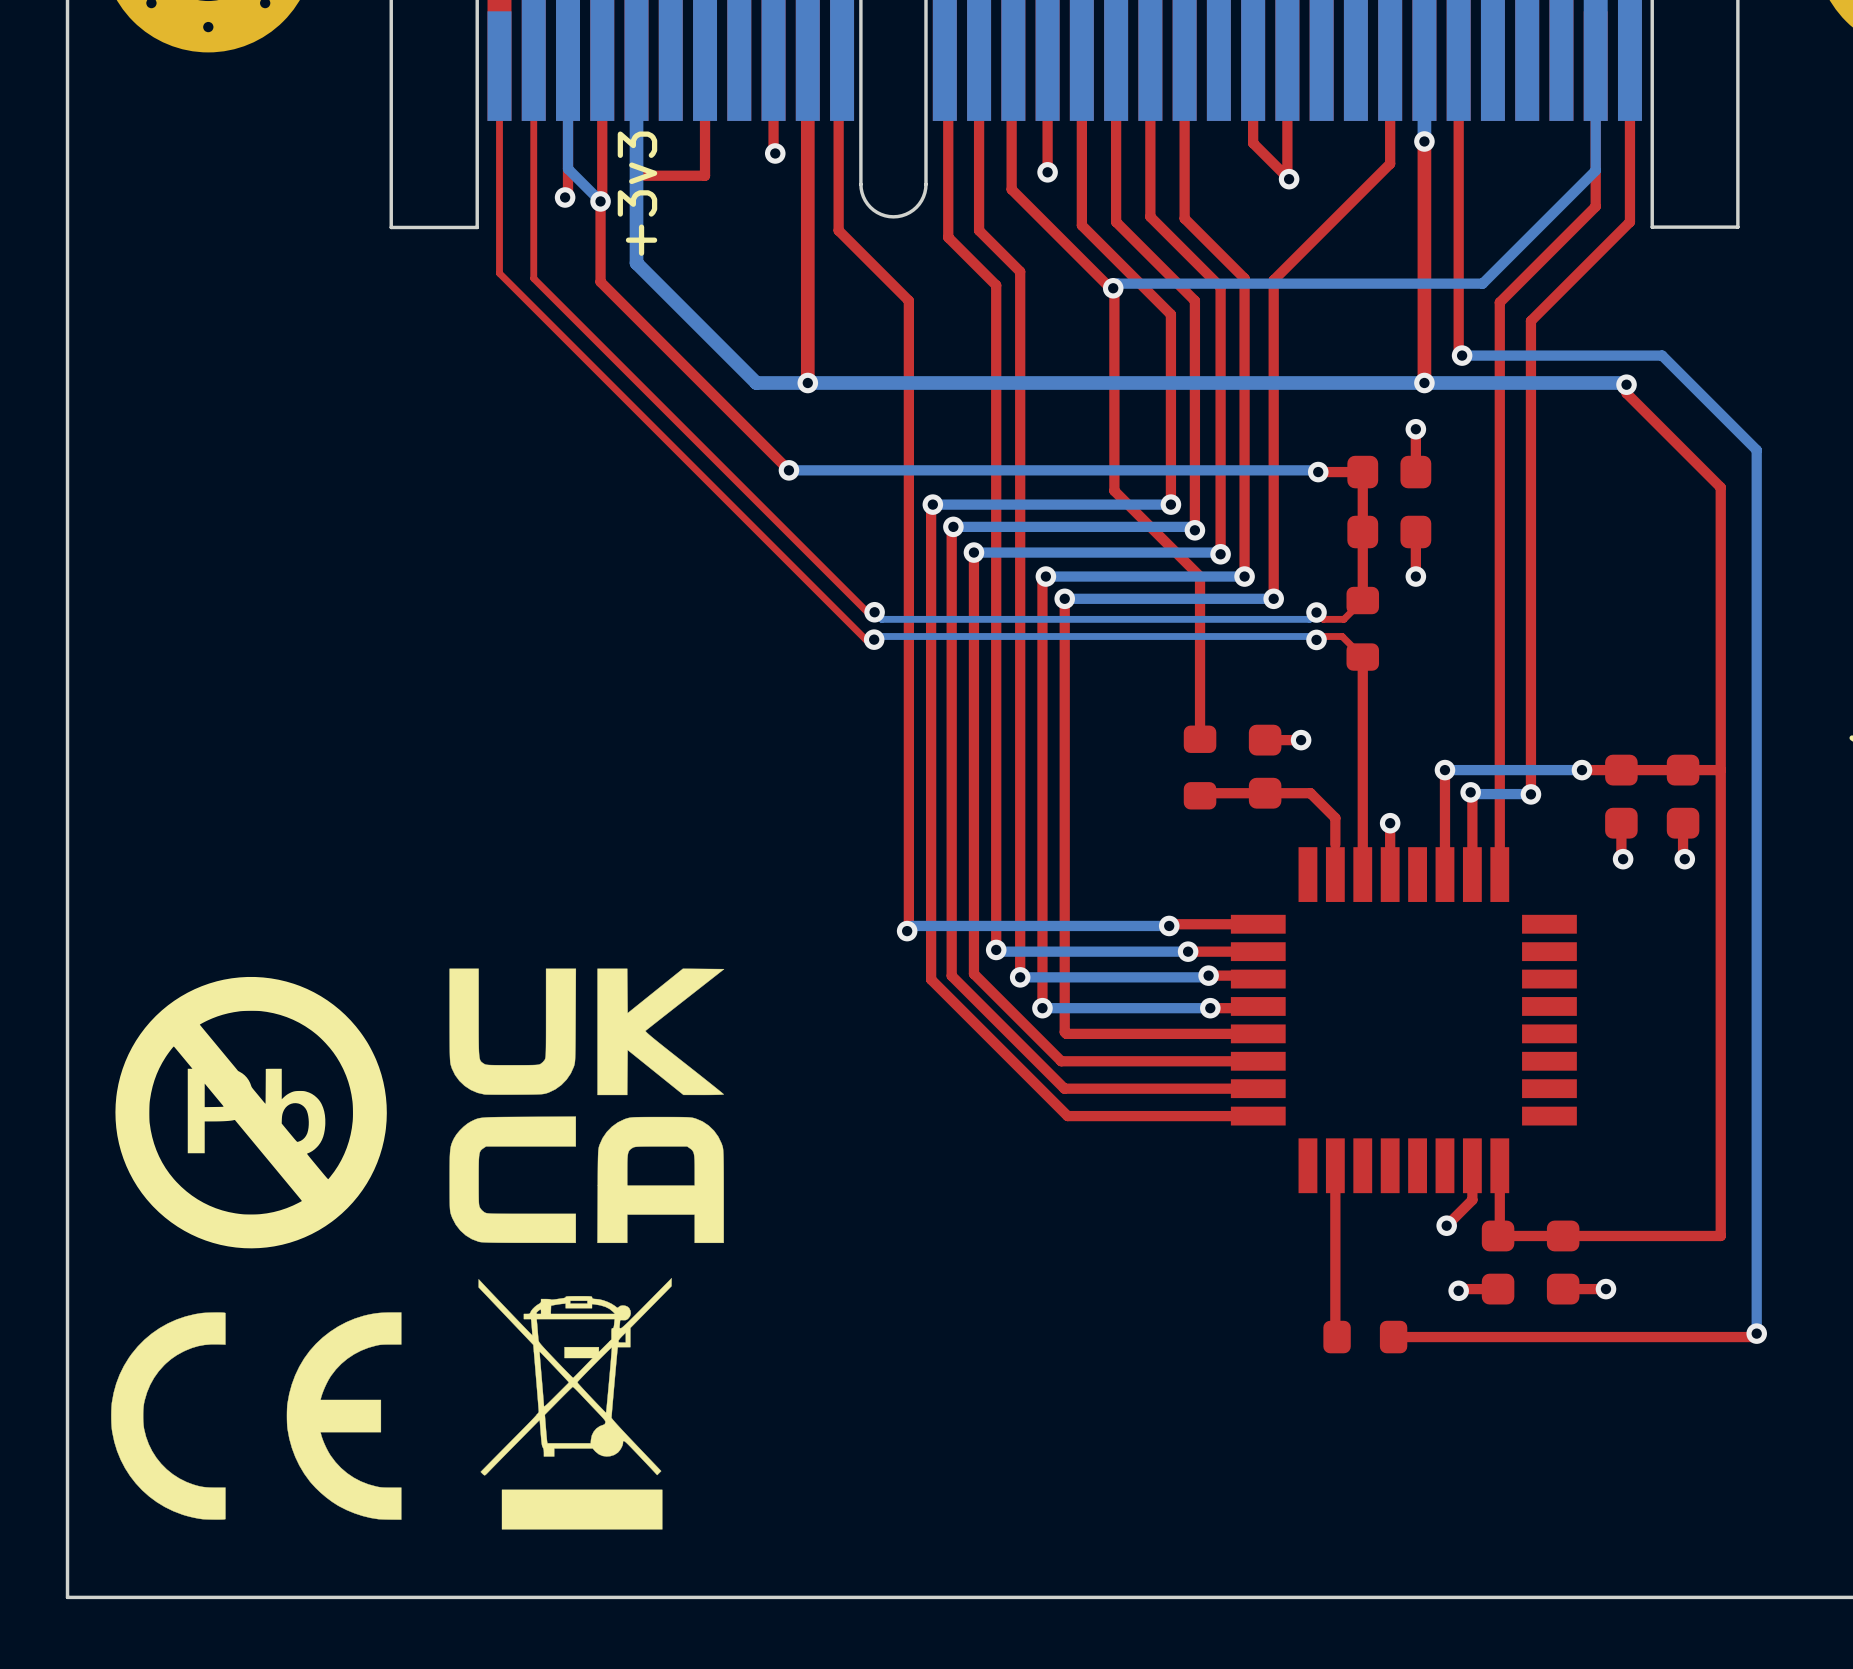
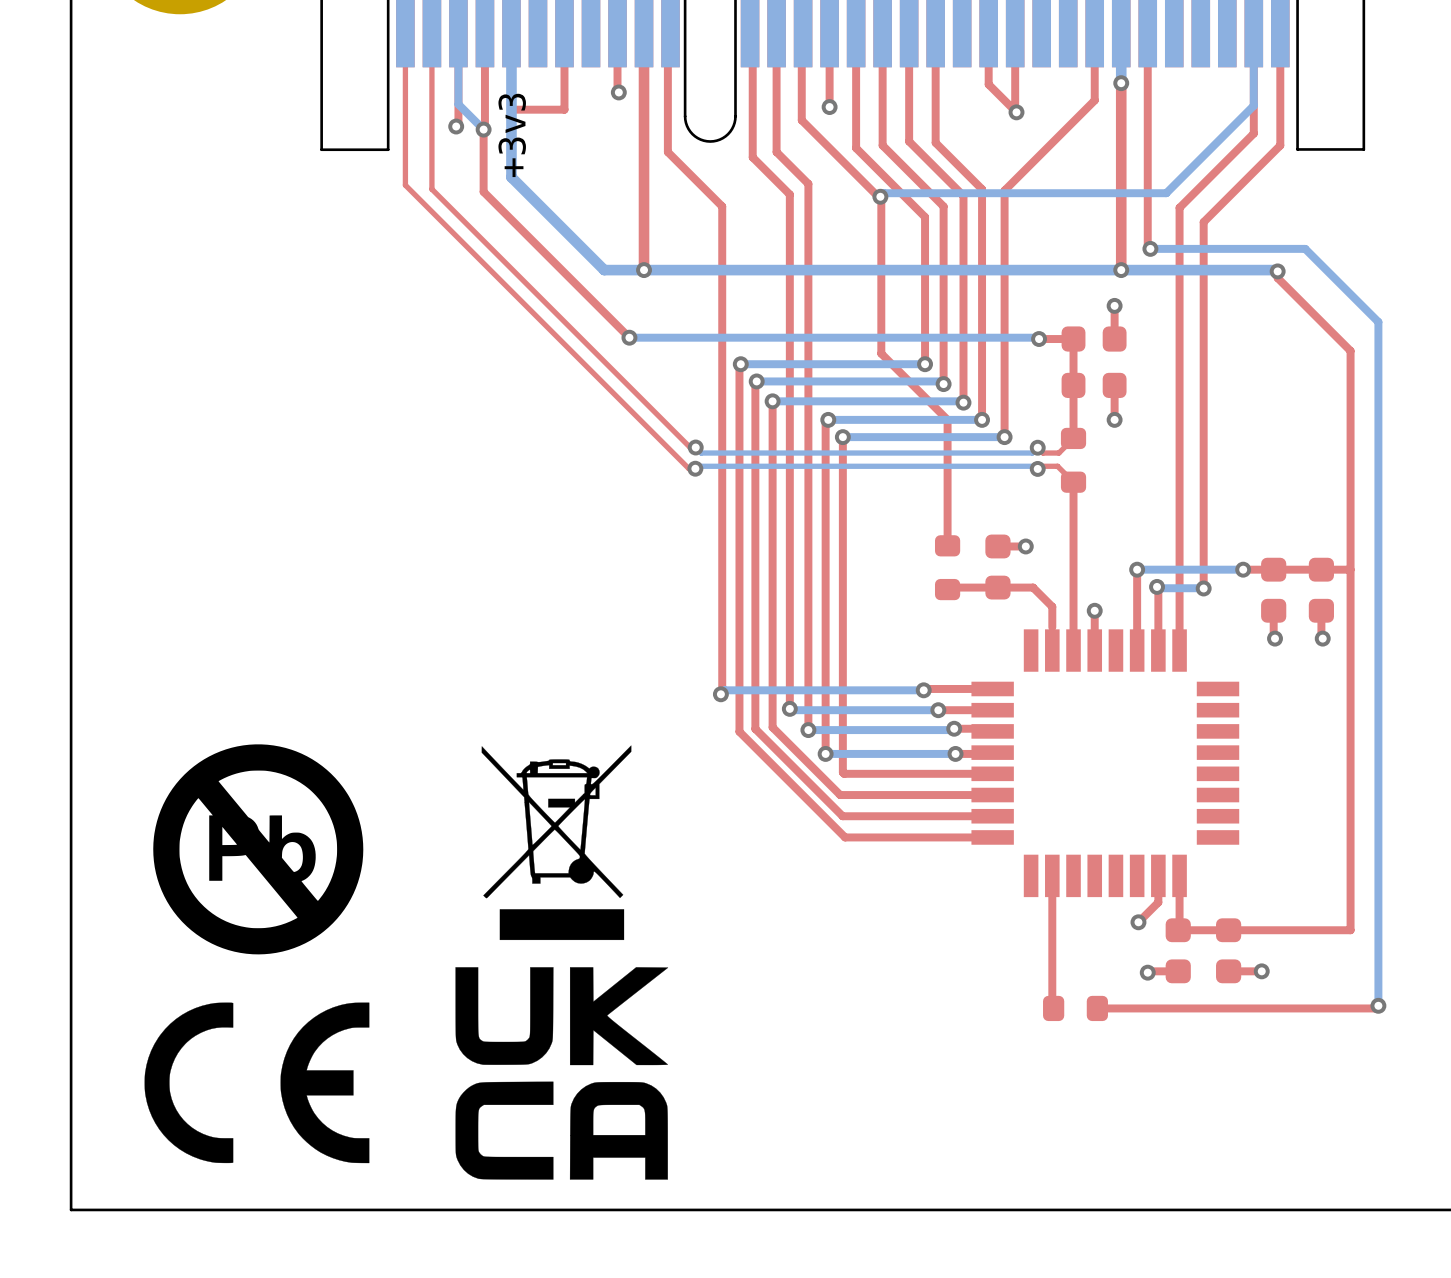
drawing position: (586, 1105) -> (561, 1073)
drawing position: (251, 1112) -> (258, 849)
drawing position: (575, 1403) -> (556, 842)
drawing position: (256, 1416) -> (256, 1082)

